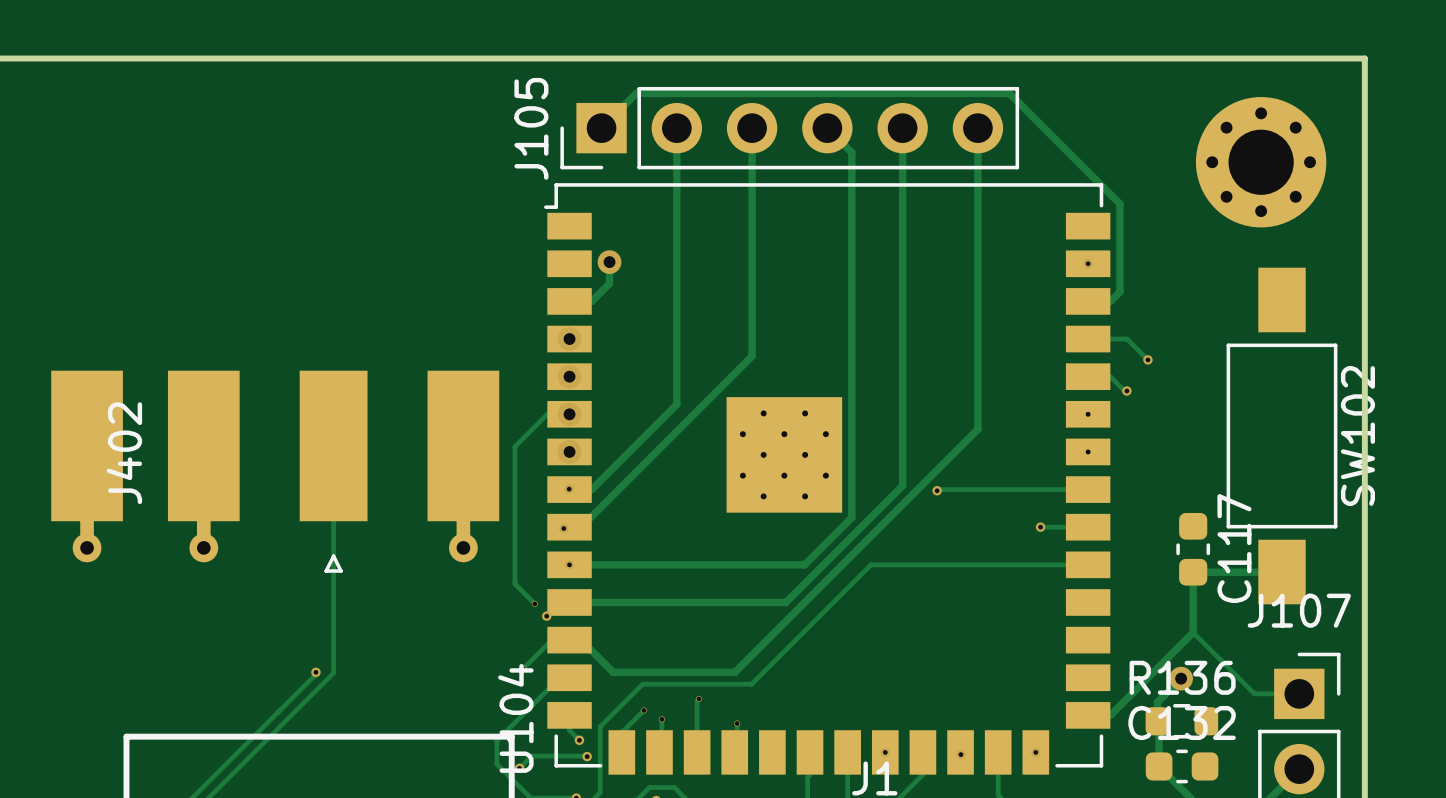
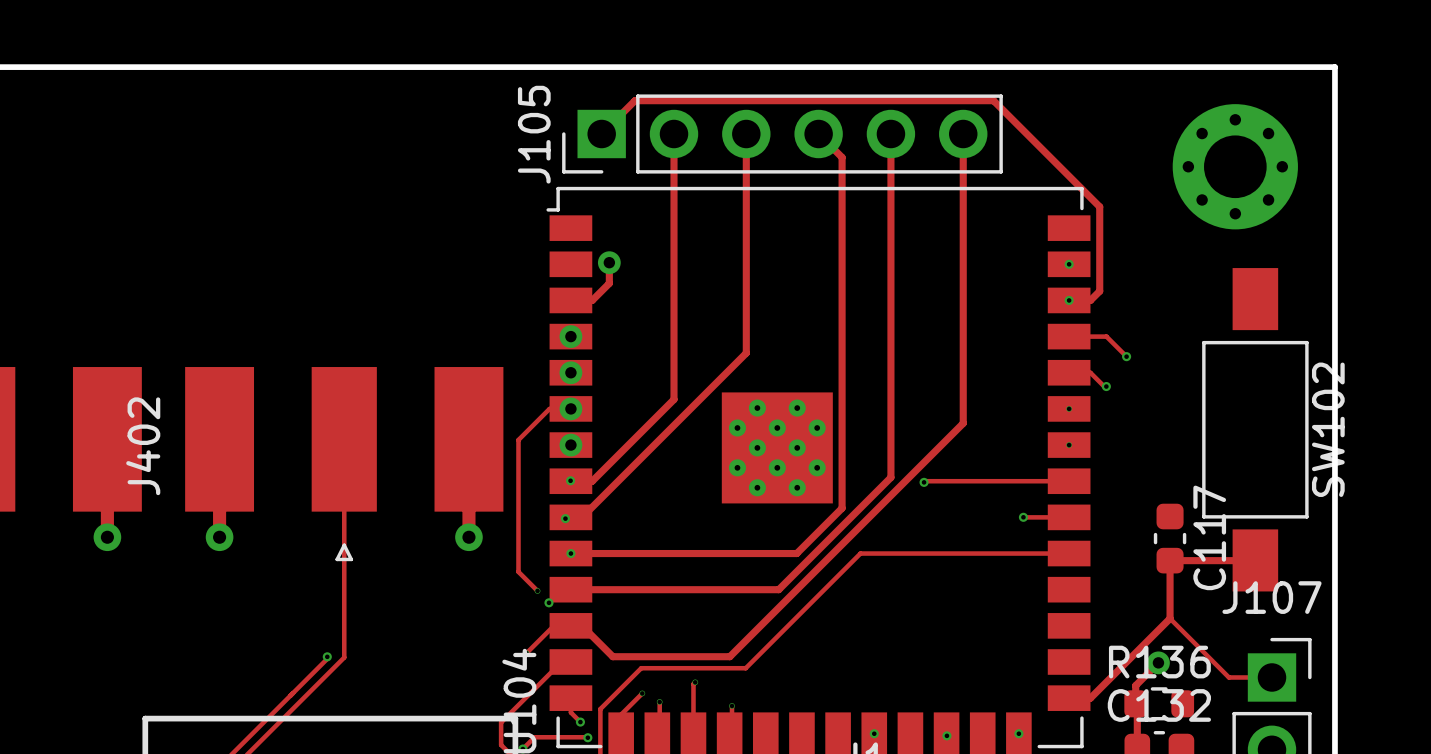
via: none -> (1069, 300)

